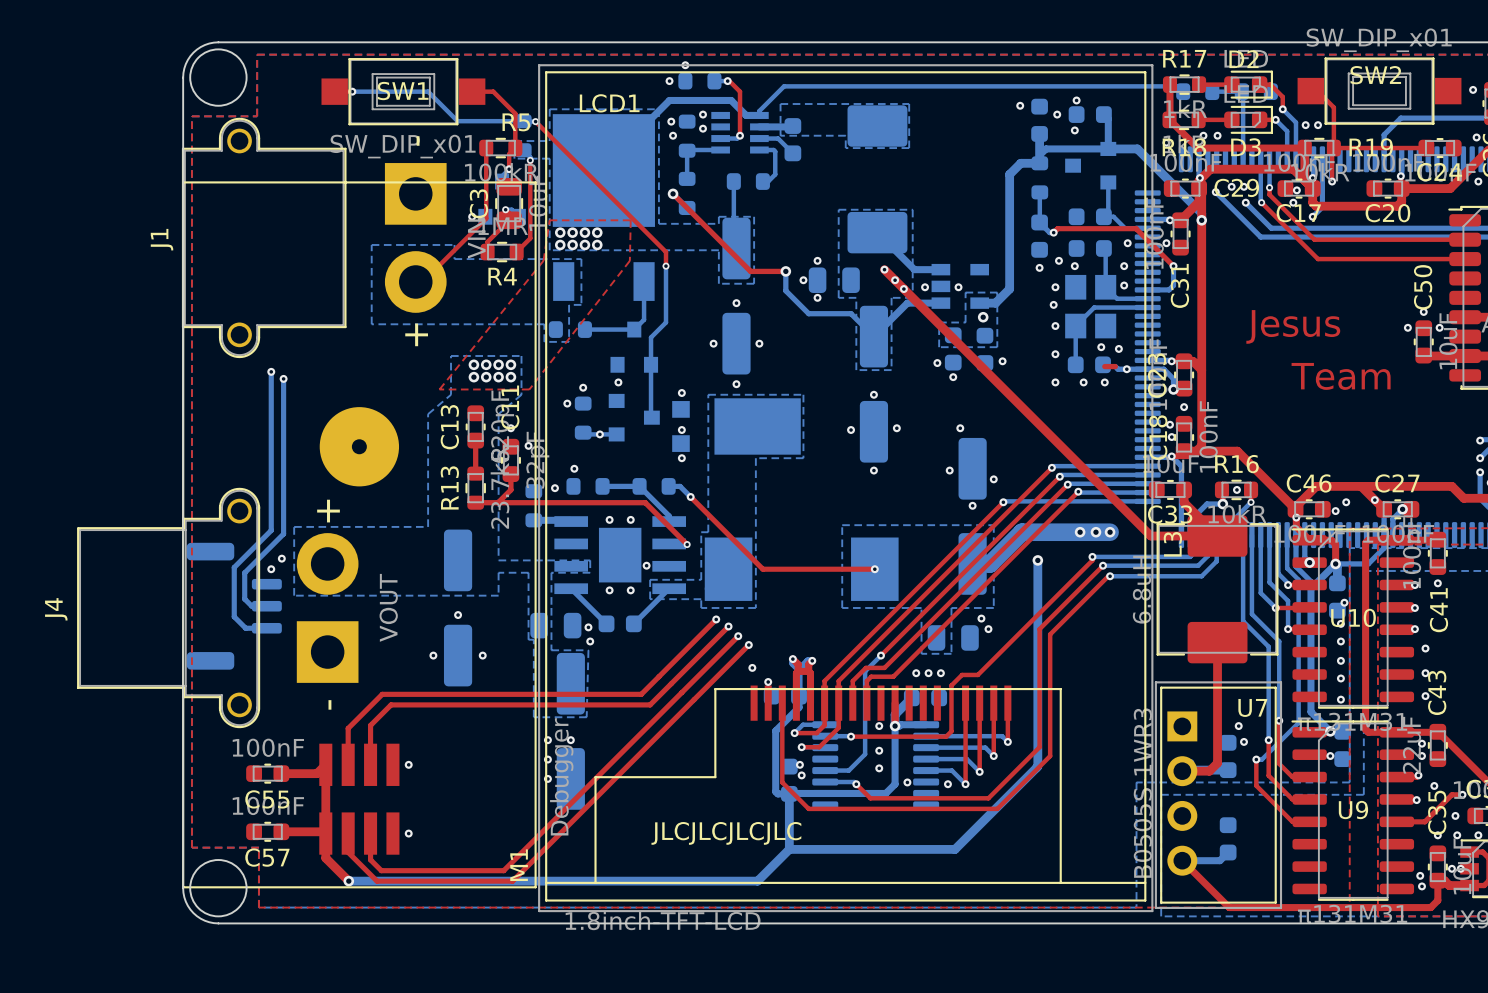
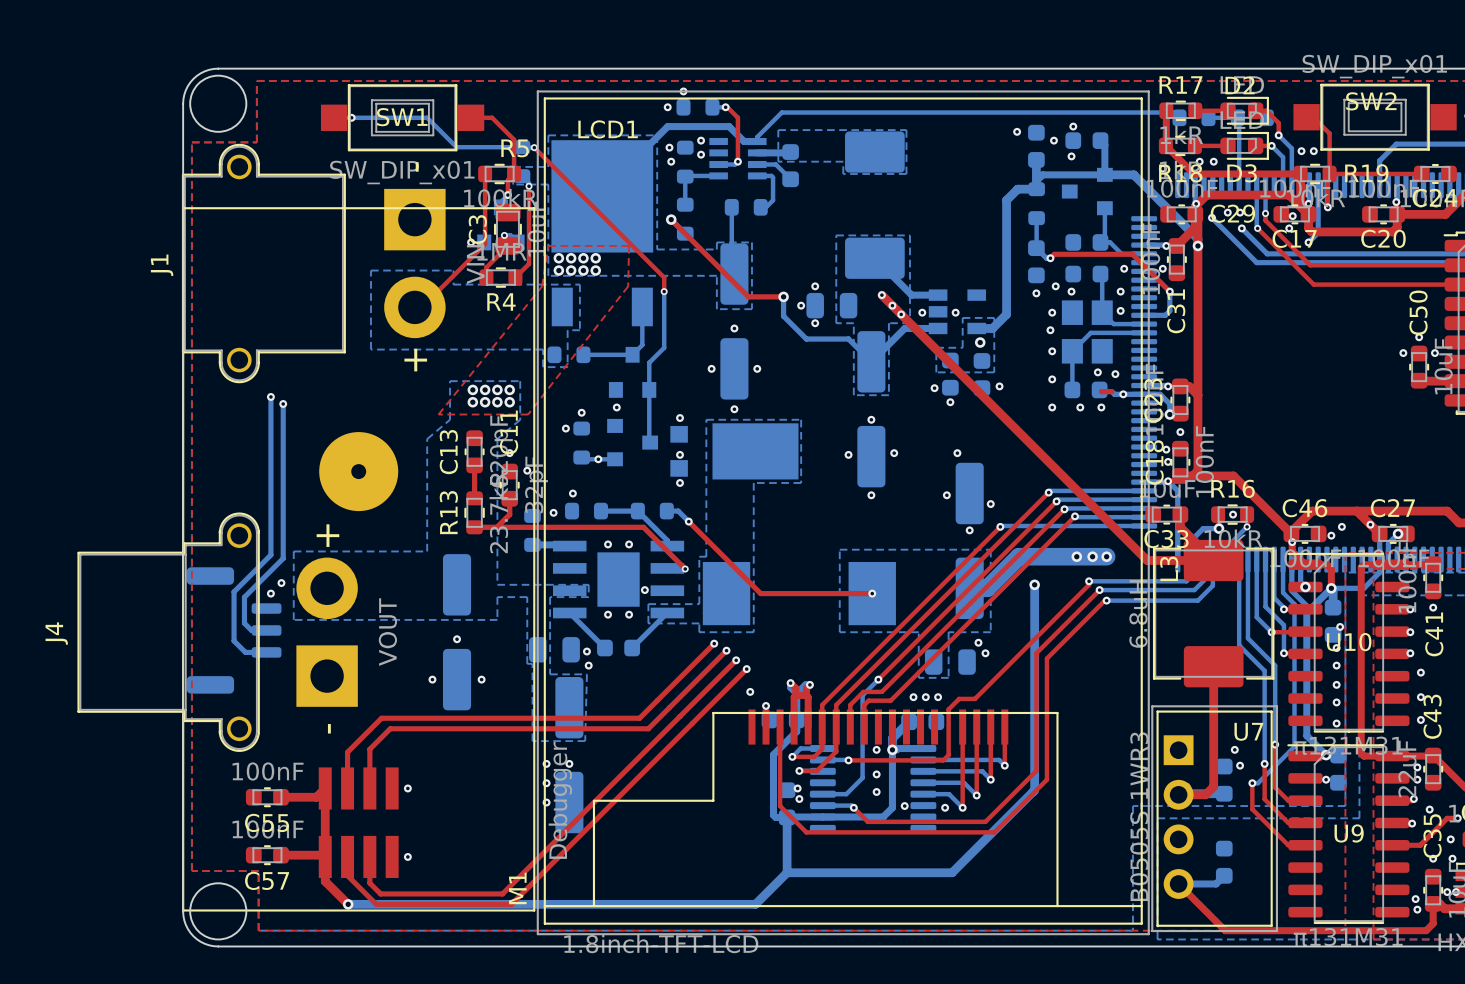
text: Jesus (1293, 326) -> none
text: Team (1341, 376) -> none
text: JLCJLCJLCJLC (726, 833) -> none

